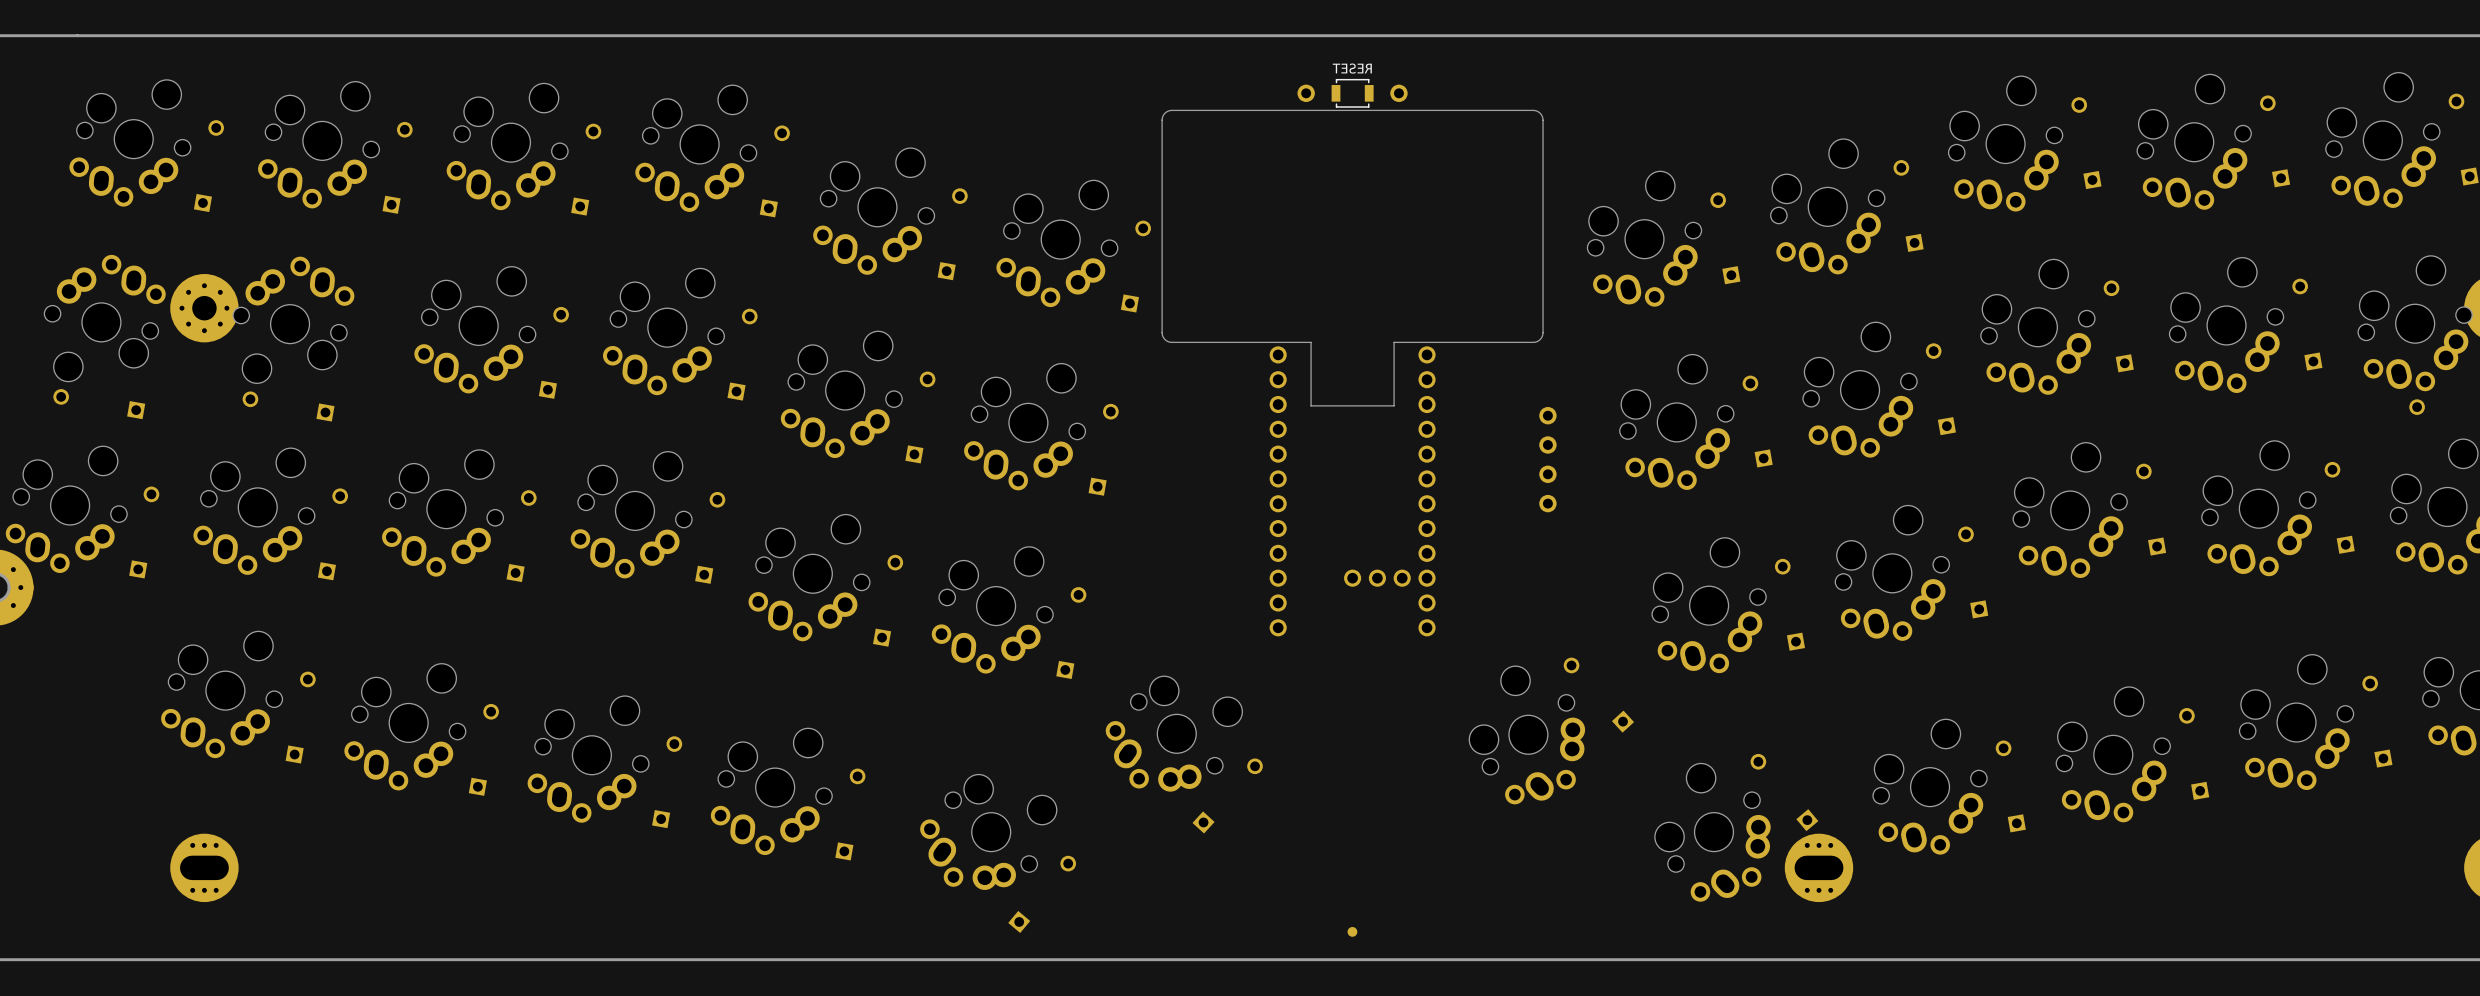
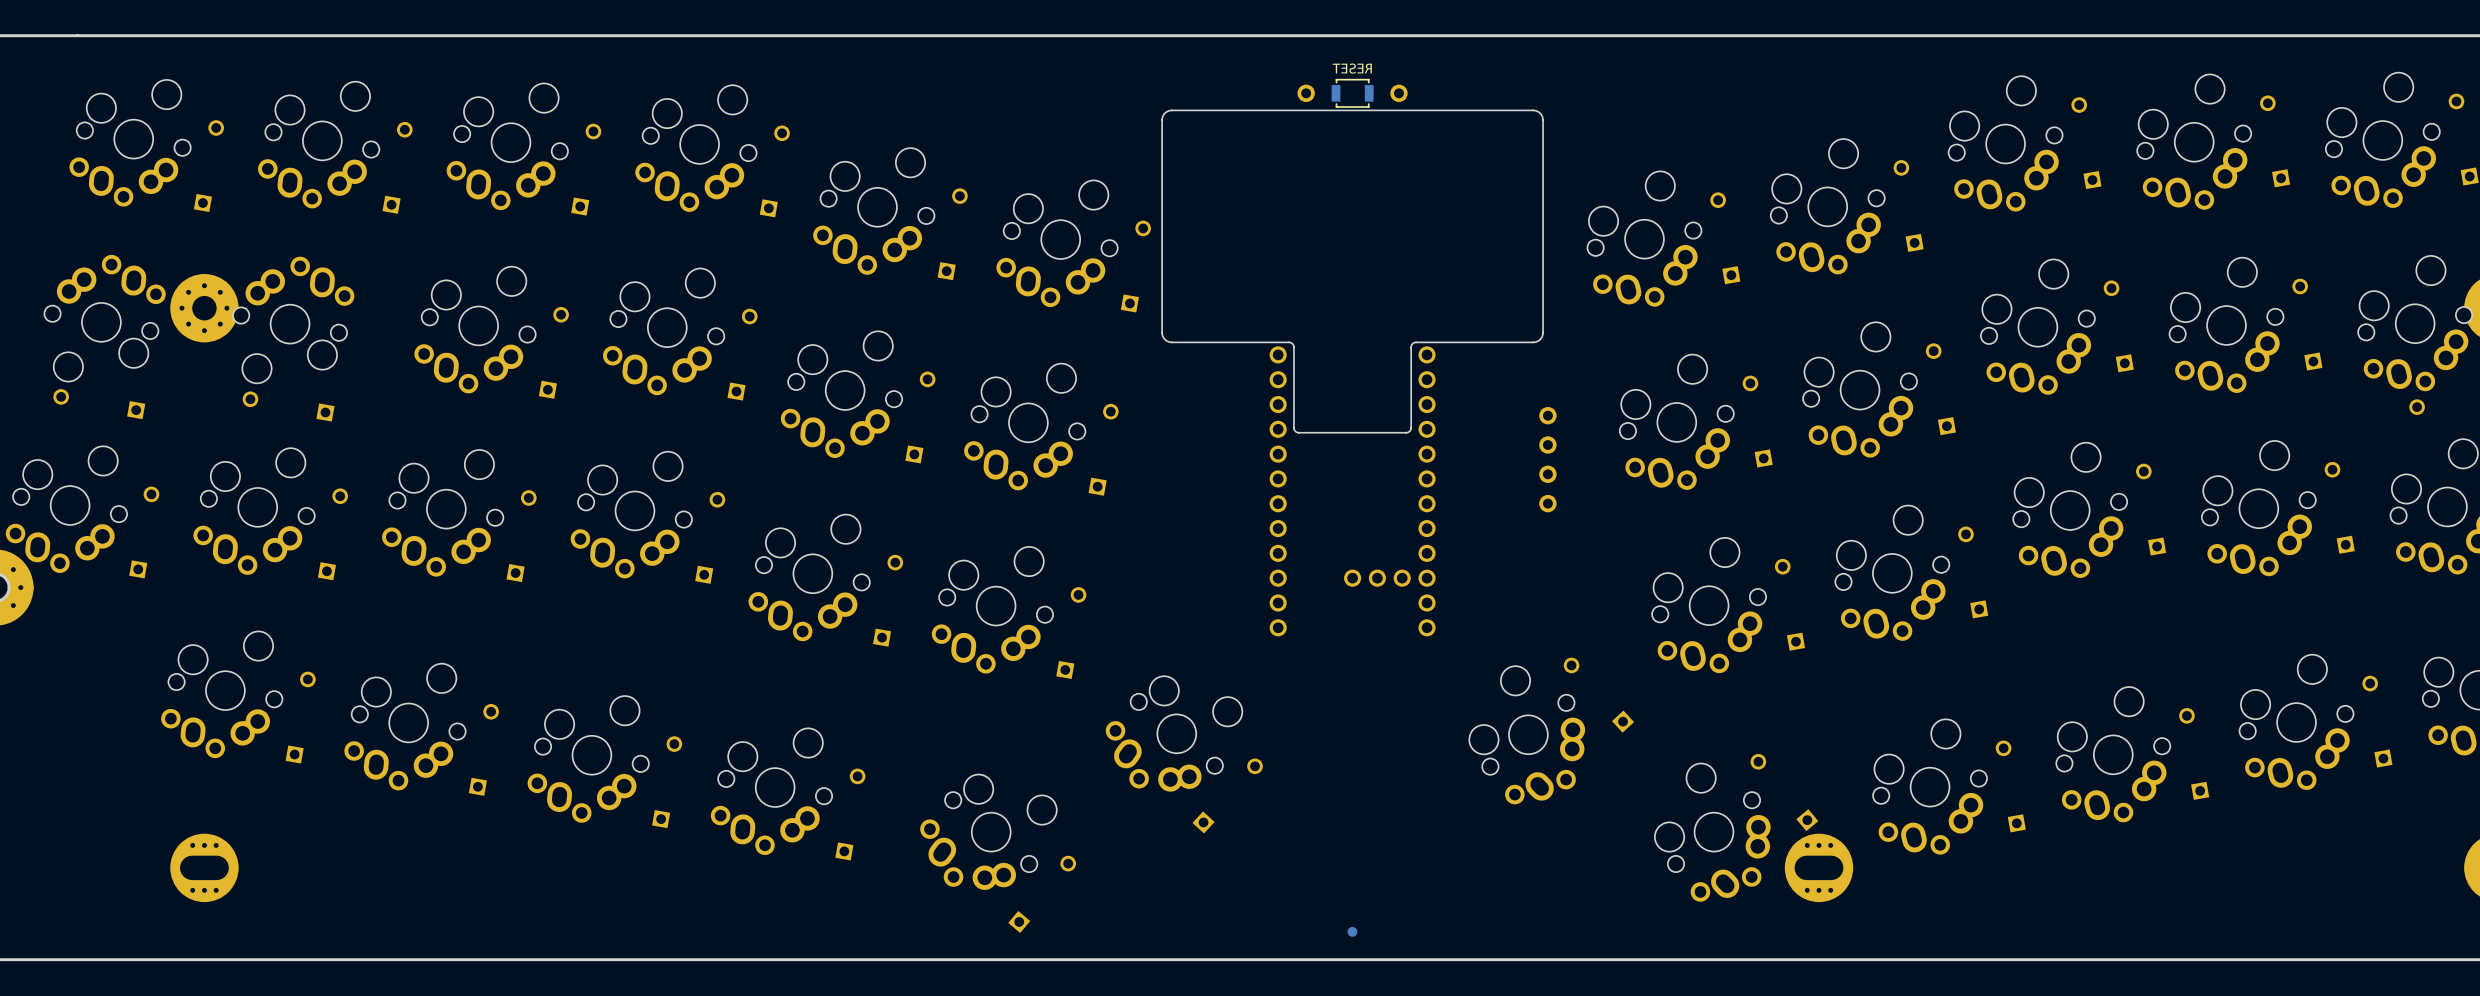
board edge: (1416, 342) (1394, 342) (1394, 405) (1311, 405) (1311, 342) (1289, 342) -> (1416, 342) (1411, 346) (1411, 427) (1406, 432) (1295, 431) (1293, 427) (1293, 346) (1289, 342)

